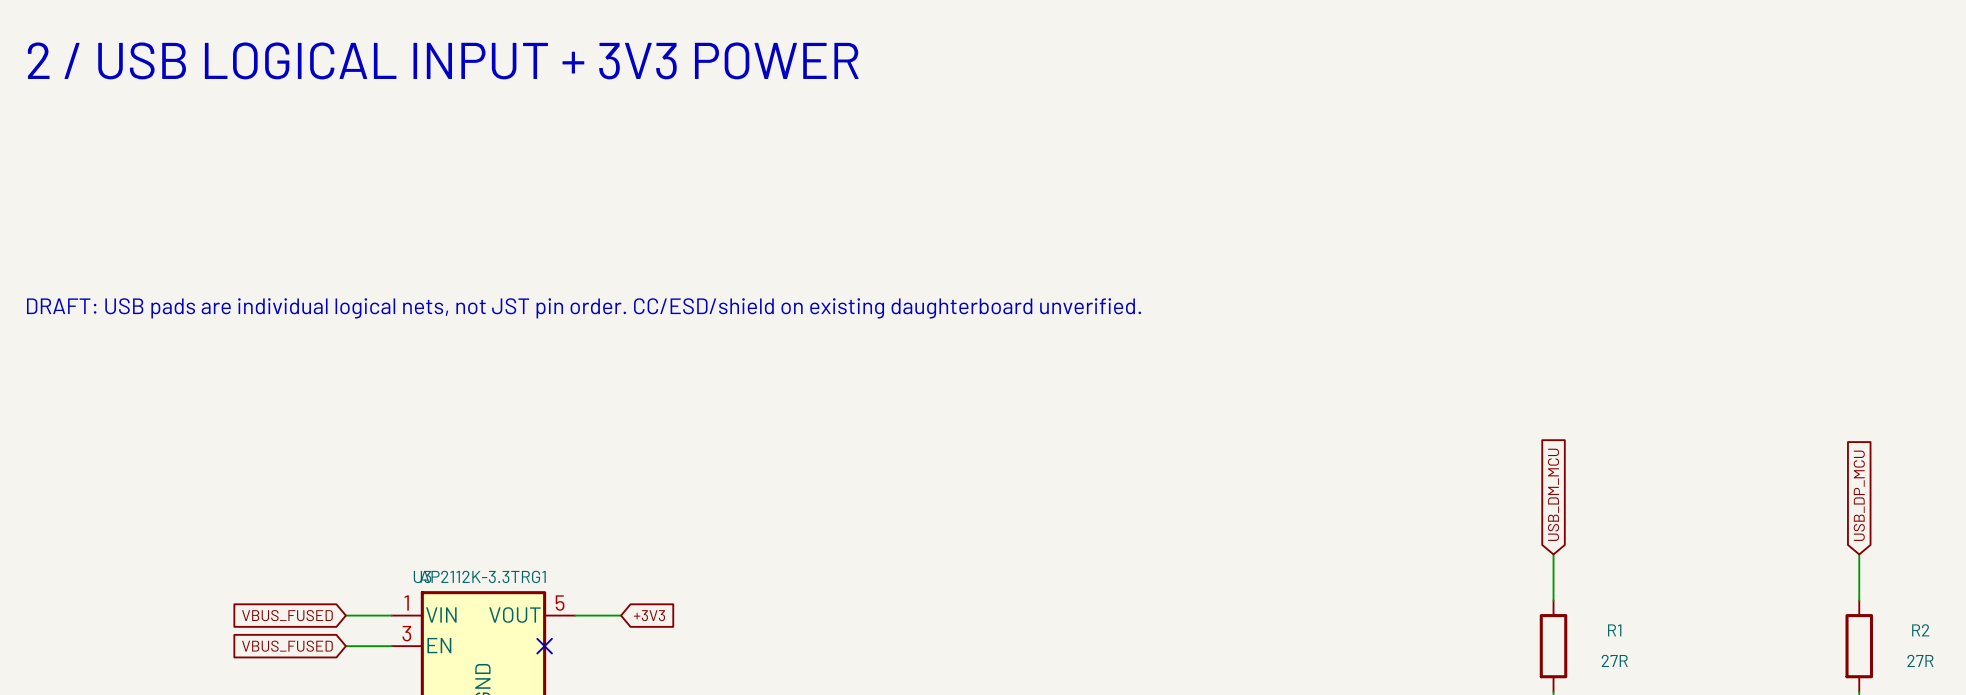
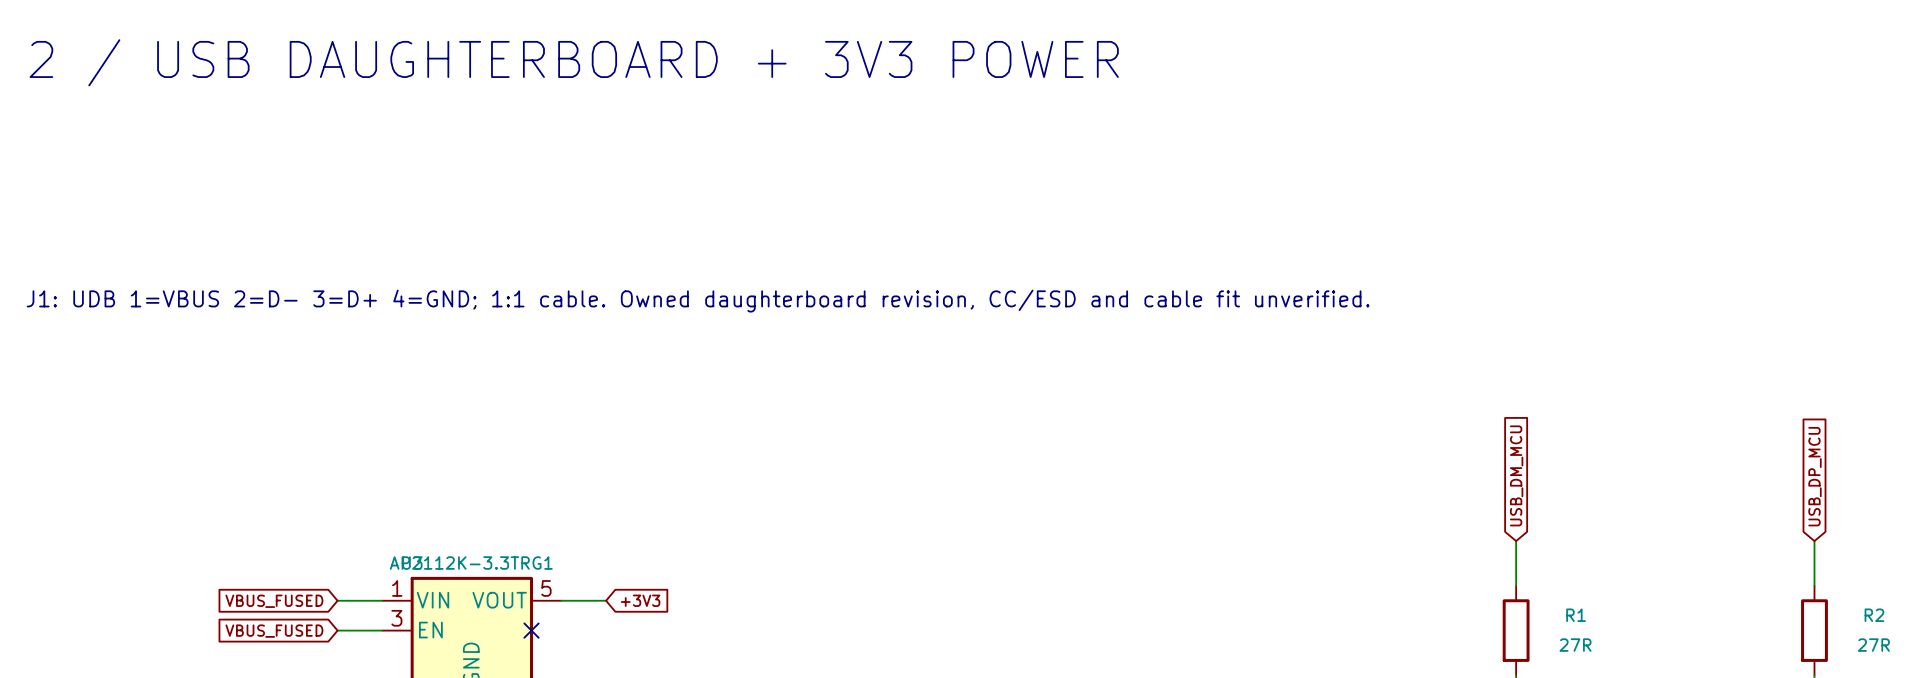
text: 2 / USB LOGICAL INPUT + 3V3 POWER (443, 60) -> 2 / USB DAUGHTERBOARD + 3V3 POWER (574, 62)
text: DRAFT: USB pads are individual logical nets, not JST pin order. CC/ESD/shield on existing daughterboard unverified. (584, 308) -> J1: UDB 1=VBUS 2=D- 3=D+ 4=GND; 1:1 cable. Owned daughterboard revision, CC/ESD and cable fit unverified. (698, 301)

